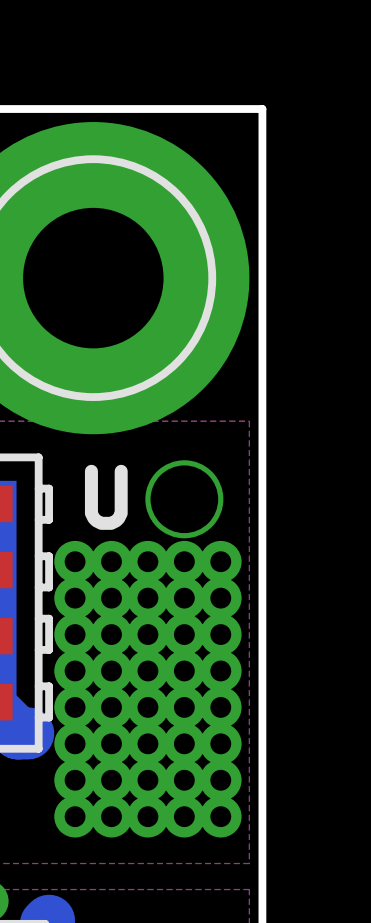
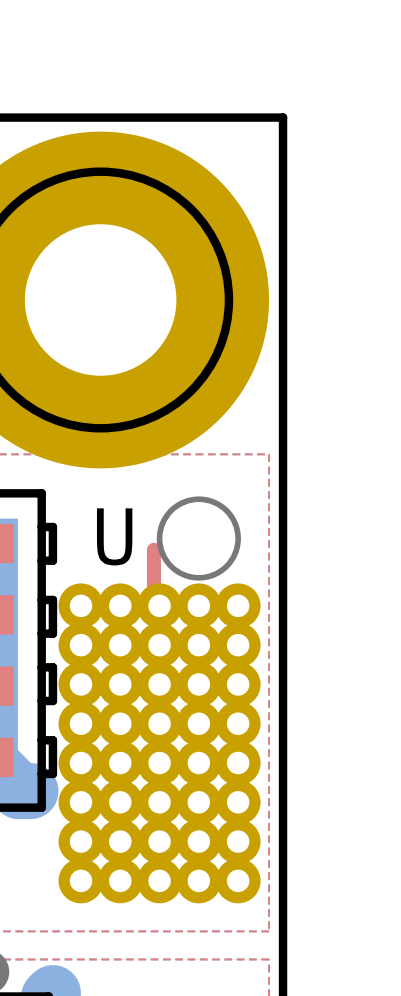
top track: none -> (153, 549) (153, 605)

